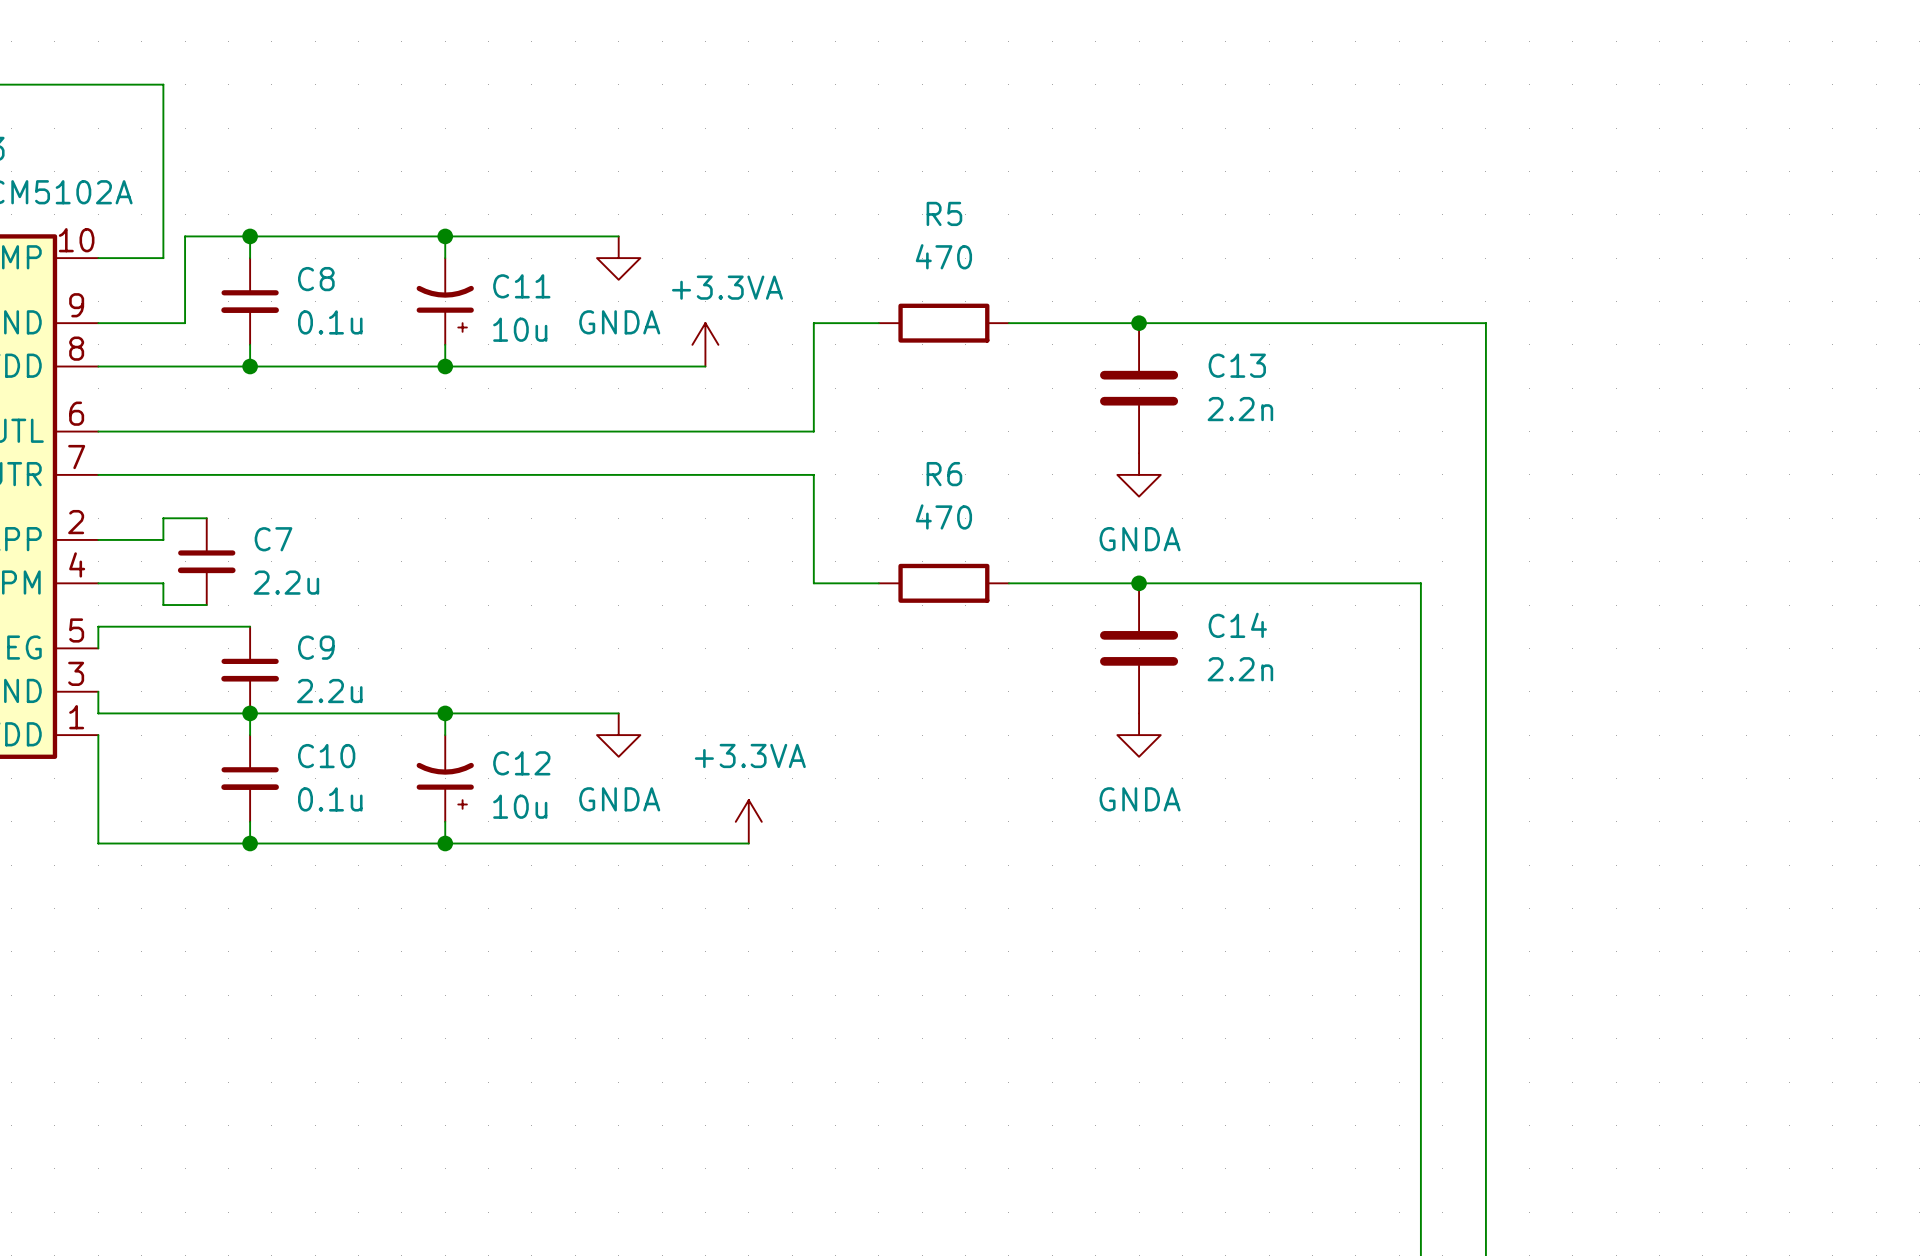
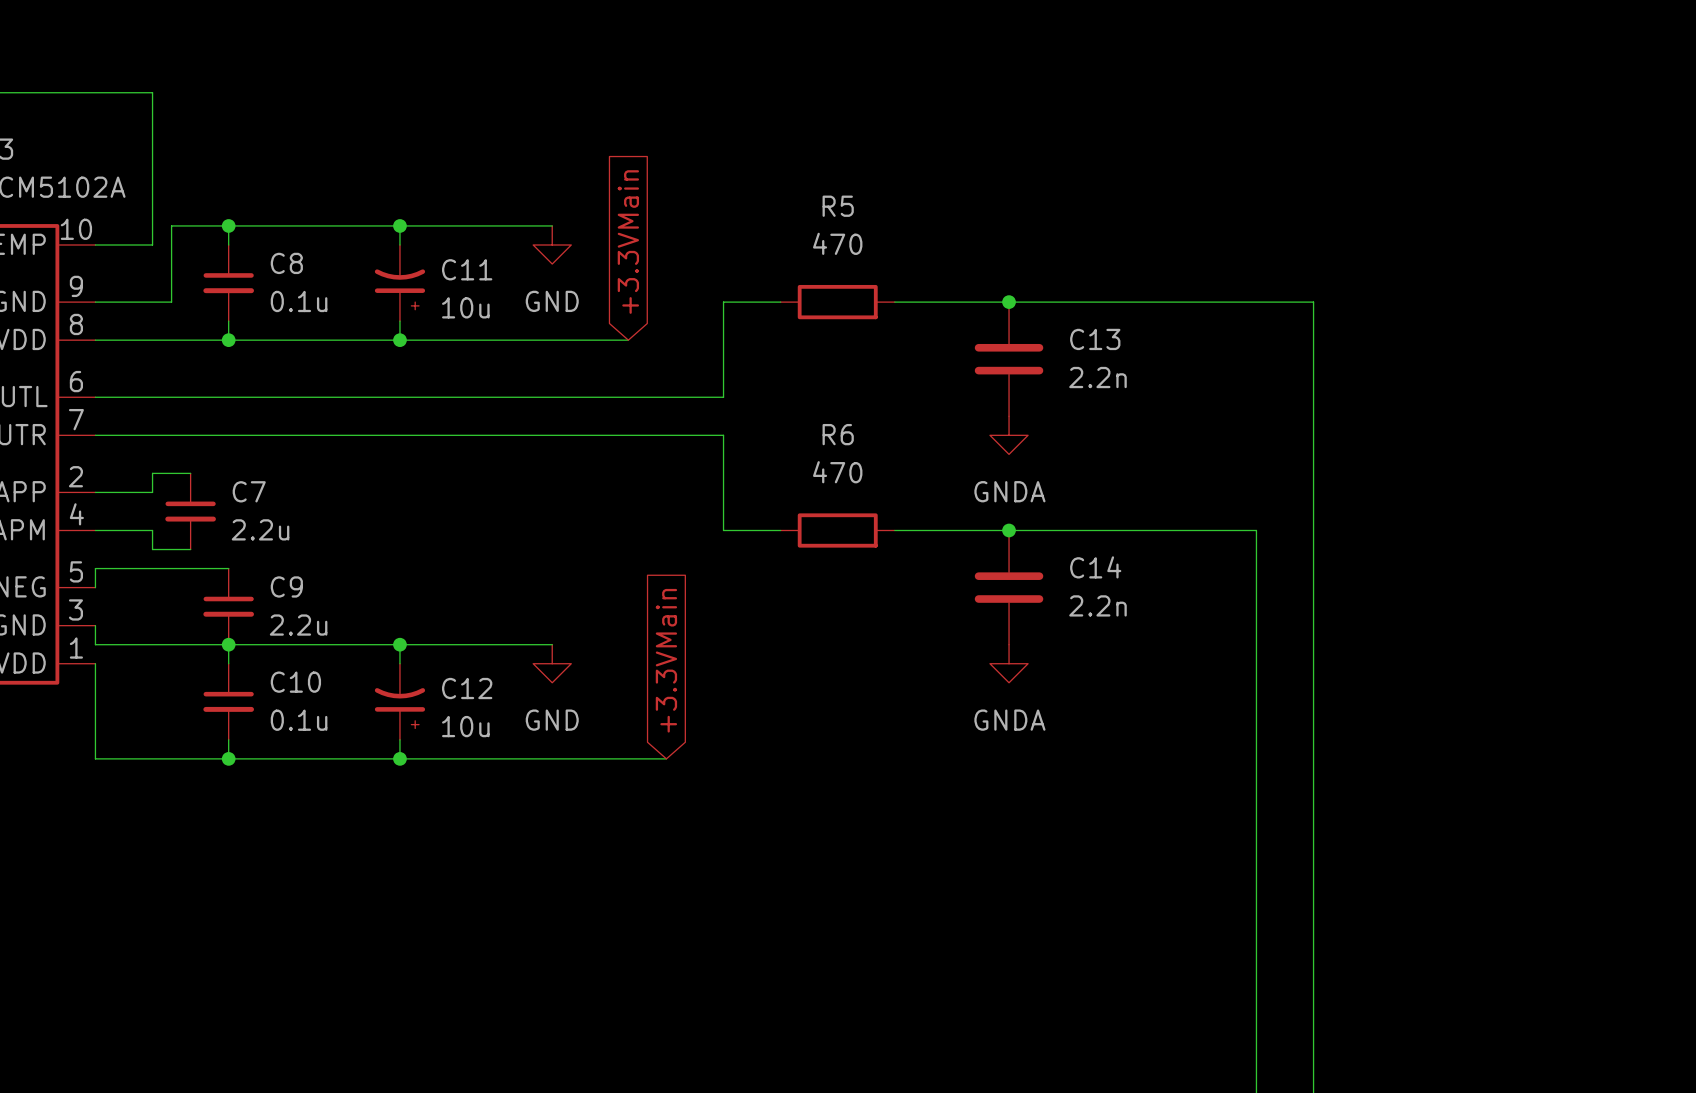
global label: none -> +3.3VMain (628, 242)
power symbol: GNDA (618, 258) -> GND (552, 245)
power symbol: +3.3VA (705, 344) -> none
global label: none -> +3.3VMain (666, 660)
power symbol: GNDA (618, 735) -> GND (552, 663)
power symbol: +3.3VA (748, 821) -> none

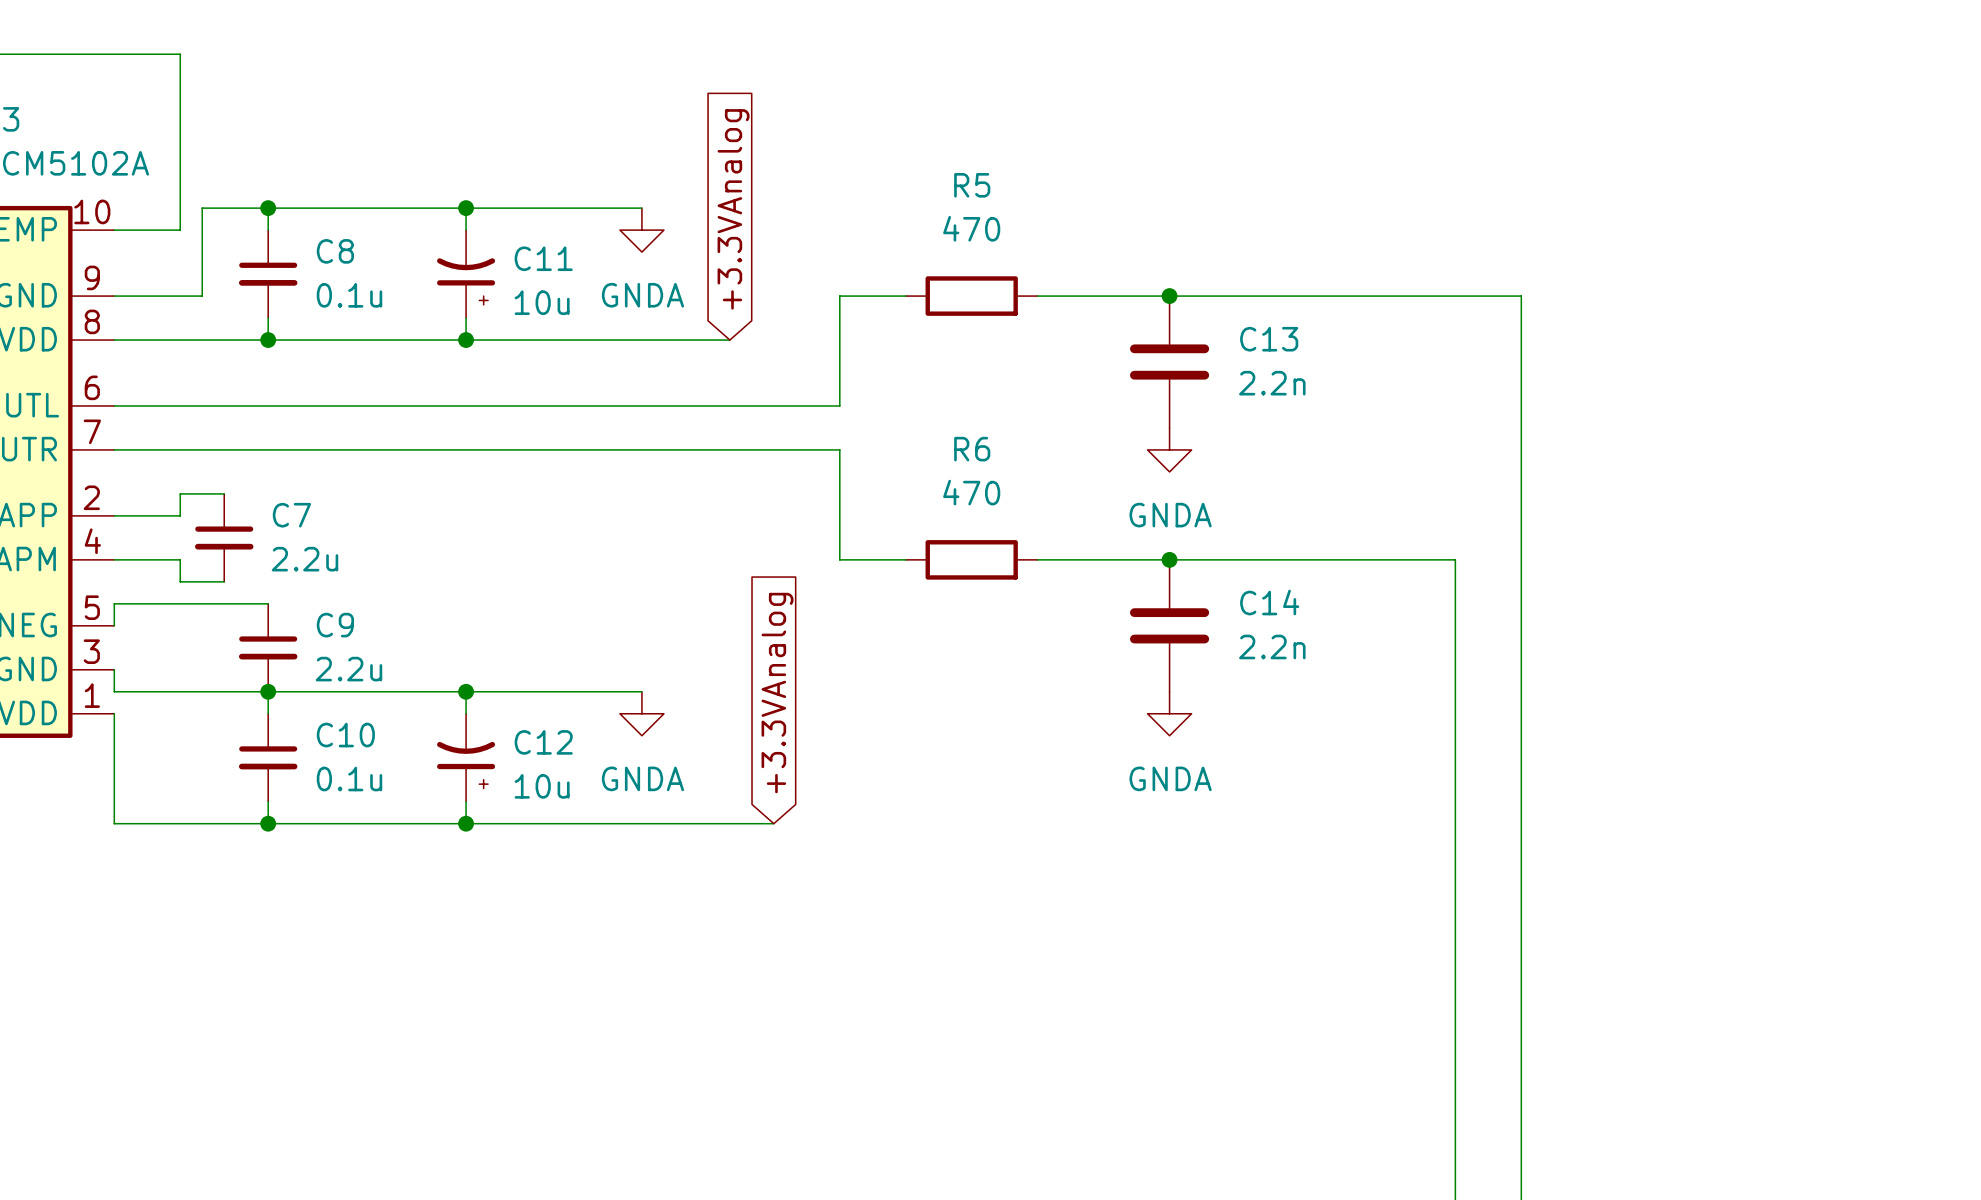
global label: +3.3VMain (628, 242) -> +3.3VAnalog (733, 209)
power symbol: GND (552, 245) -> GNDA (641, 230)
global label: +3.3VMain (666, 660) -> +3.3VAnalog (777, 693)
power symbol: GND (552, 663) -> GNDA (641, 713)

